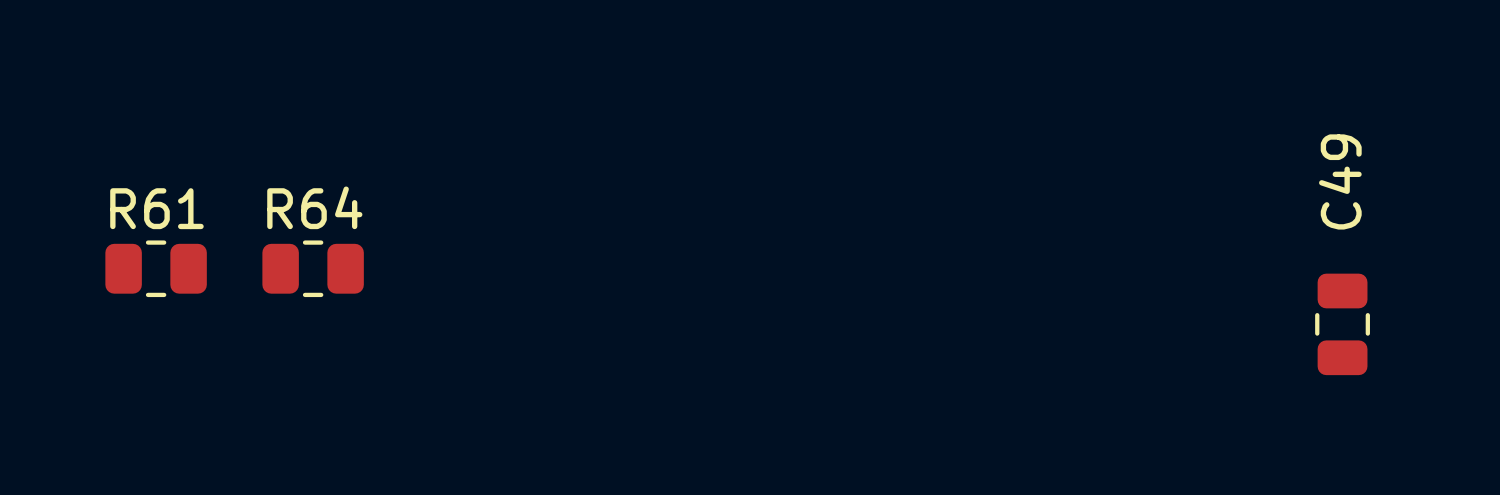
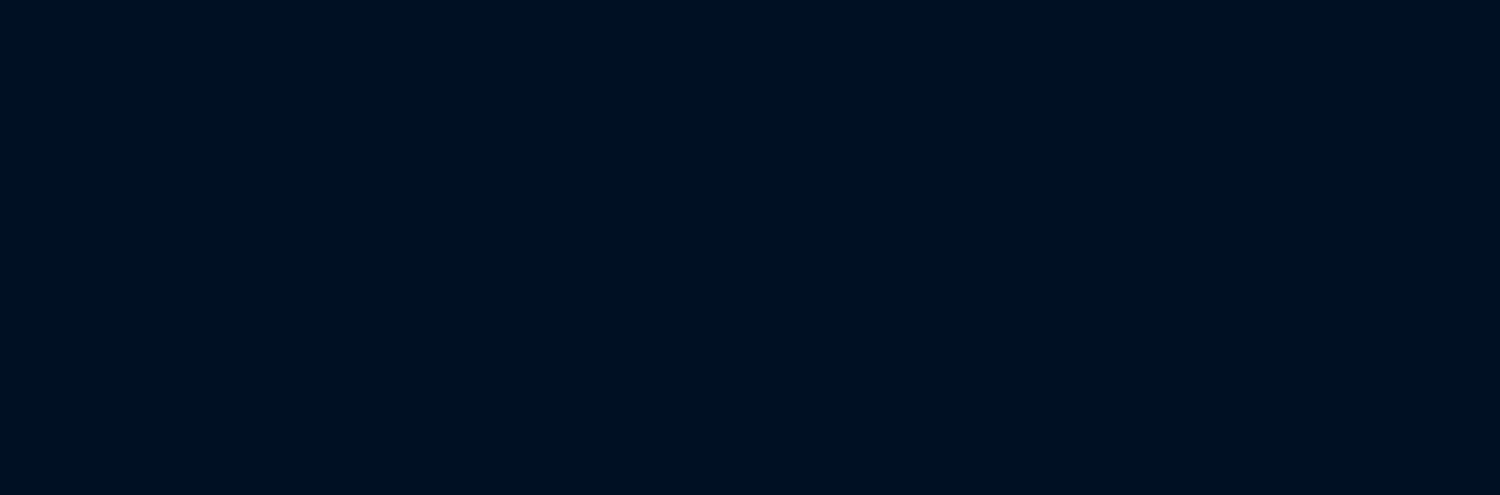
R61: (156, 268) -> none
R64: (313, 268) -> none
C49: (1342, 324) -> none

